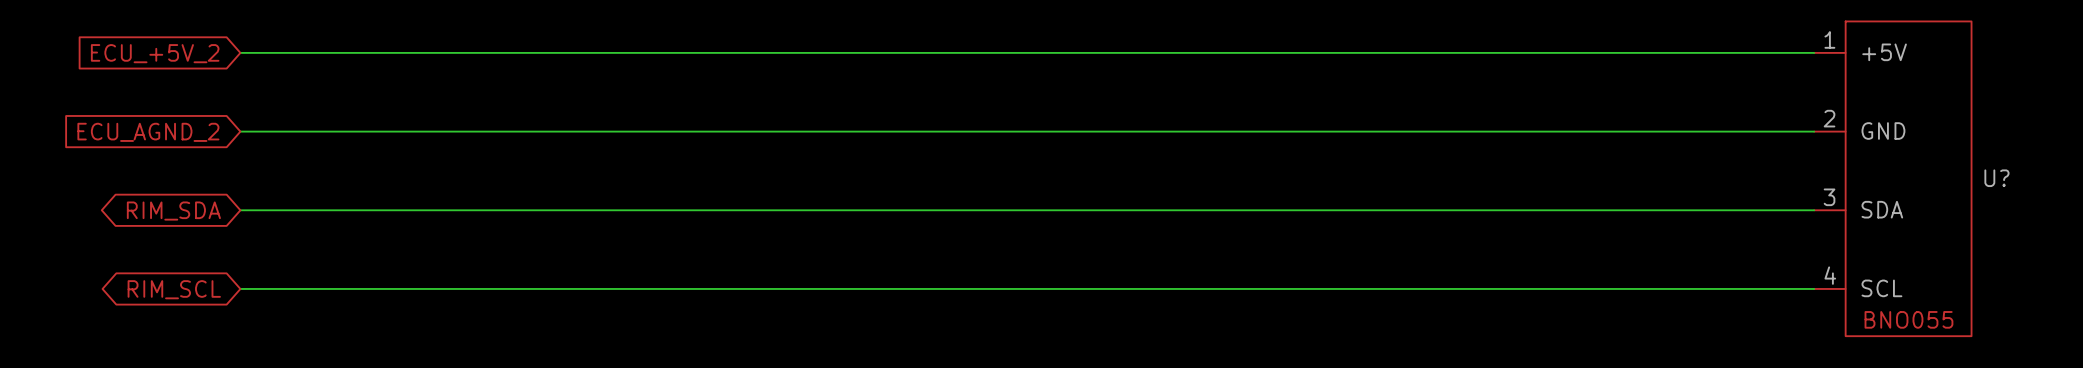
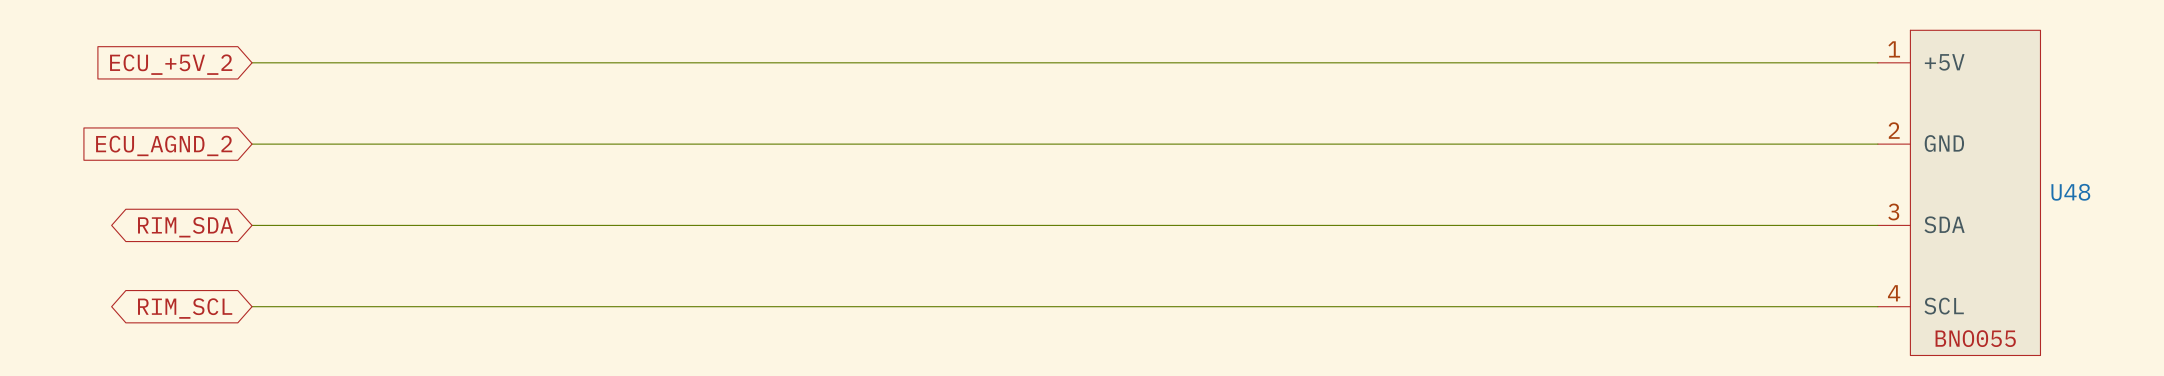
U? name: U? (1996, 178) -> U48 (2070, 192)

